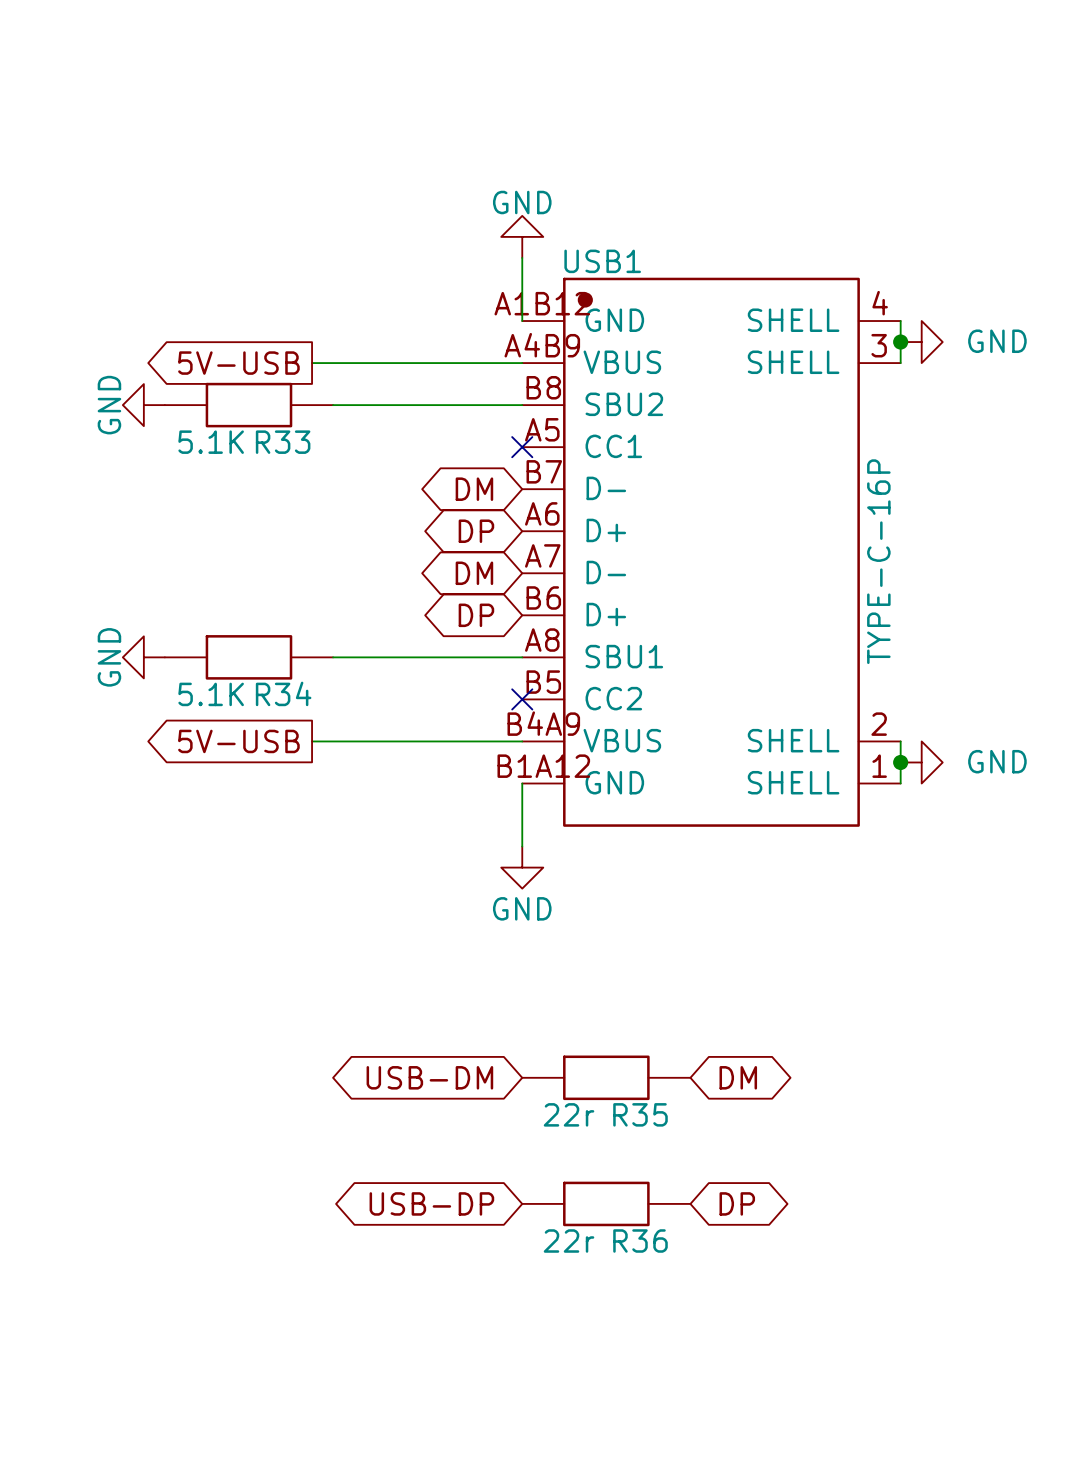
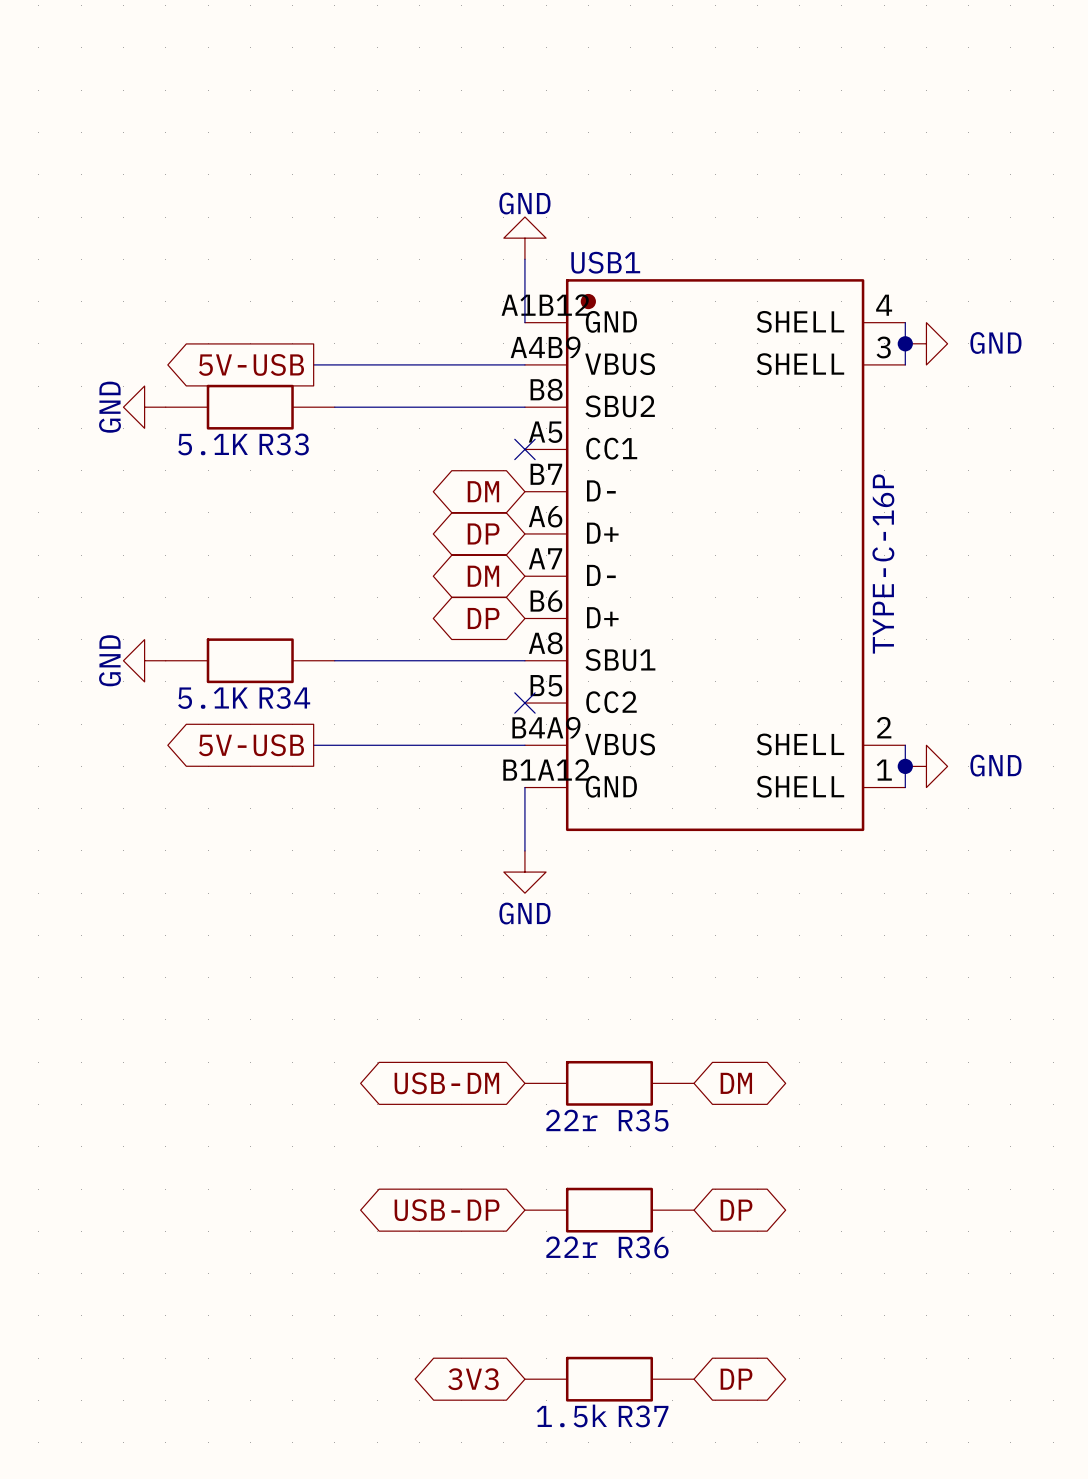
global label: none -> 3V3 (473, 1379)
R37: none -> 1.5k (609, 1379)
global label: none -> DP (736, 1379)

